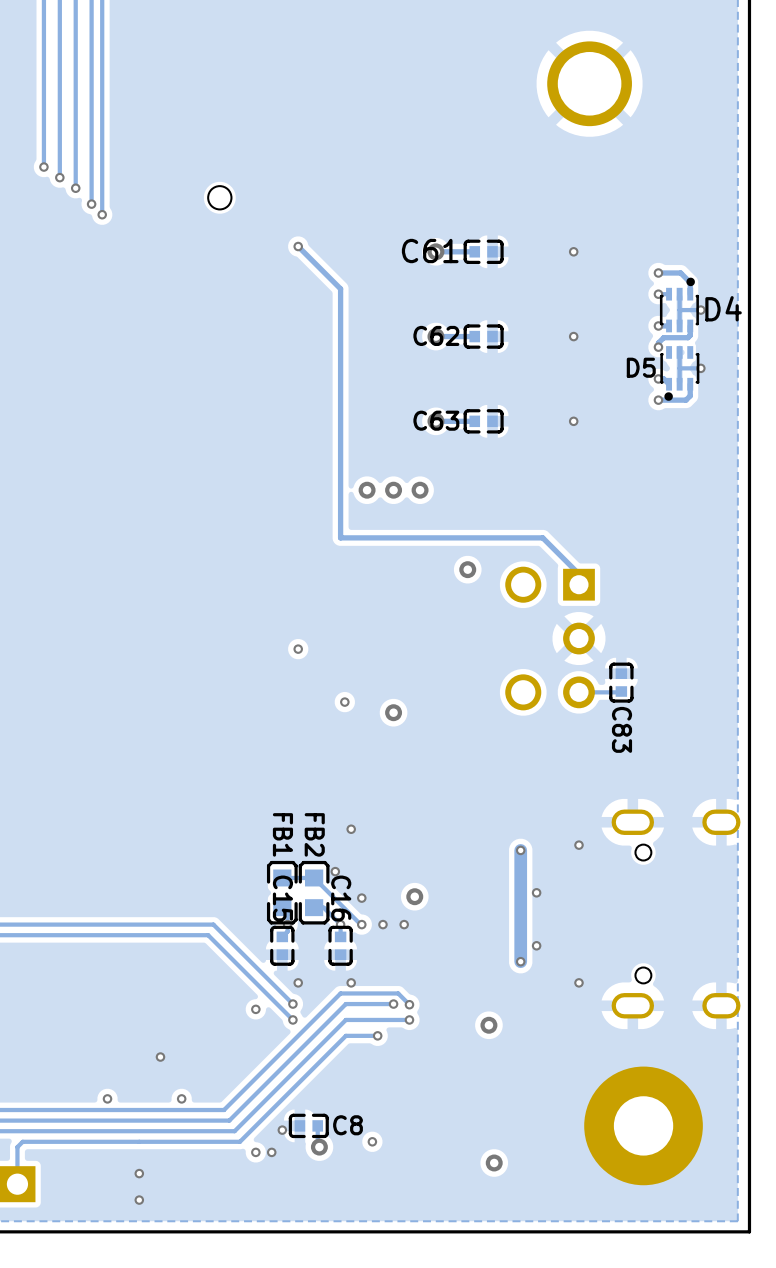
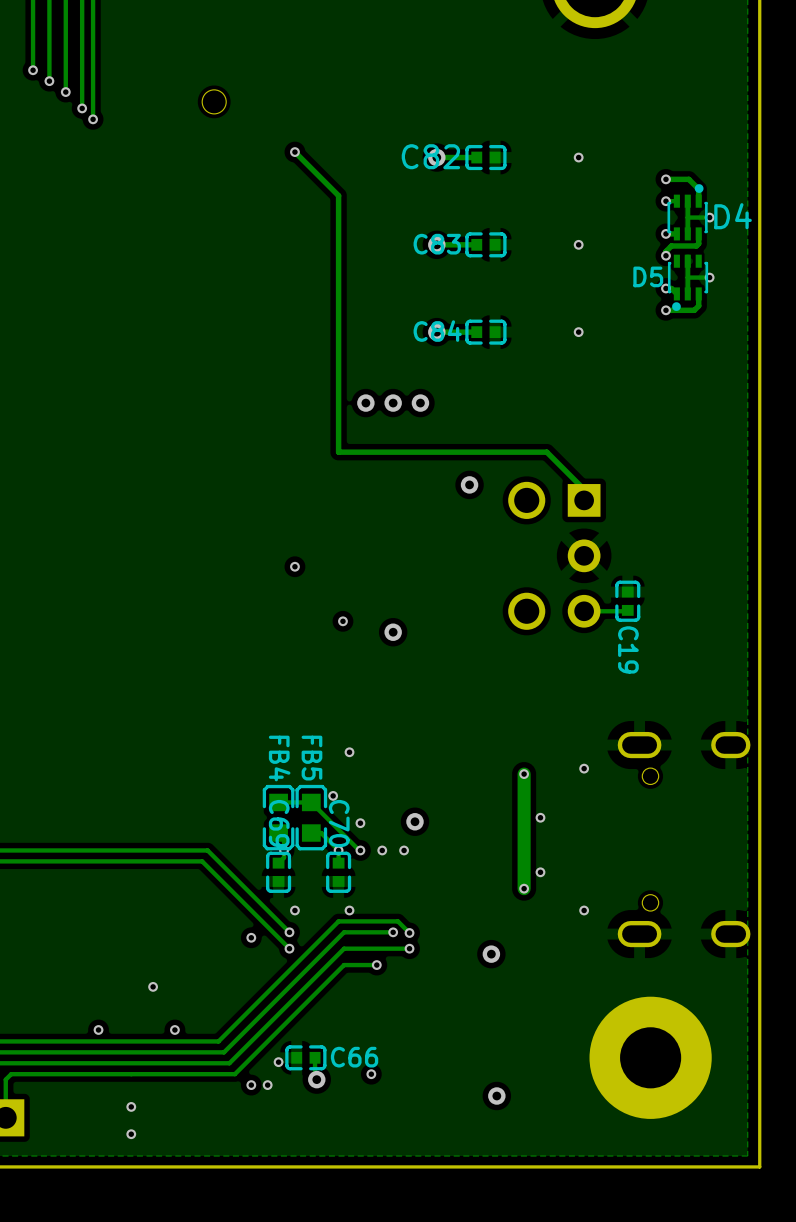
C61 name: C61 (430, 251) -> C82 (430, 156)
C62 name: C62 (436, 335) -> C83 (437, 244)
C63 name: C63 (436, 420) -> C84 (437, 331)
C83 name: C83 (622, 729) -> C19 (628, 649)
FB1 name: FB1 (282, 834) -> FB4 (279, 758)
FB2 name: FB2 (314, 834) -> FB5 (311, 758)
C15 name: C15 (282, 898) -> C69 (279, 823)
C16 name: C16 (341, 898) -> C70 (339, 823)
C8 name: C8 (348, 1125) -> C66 (354, 1057)

